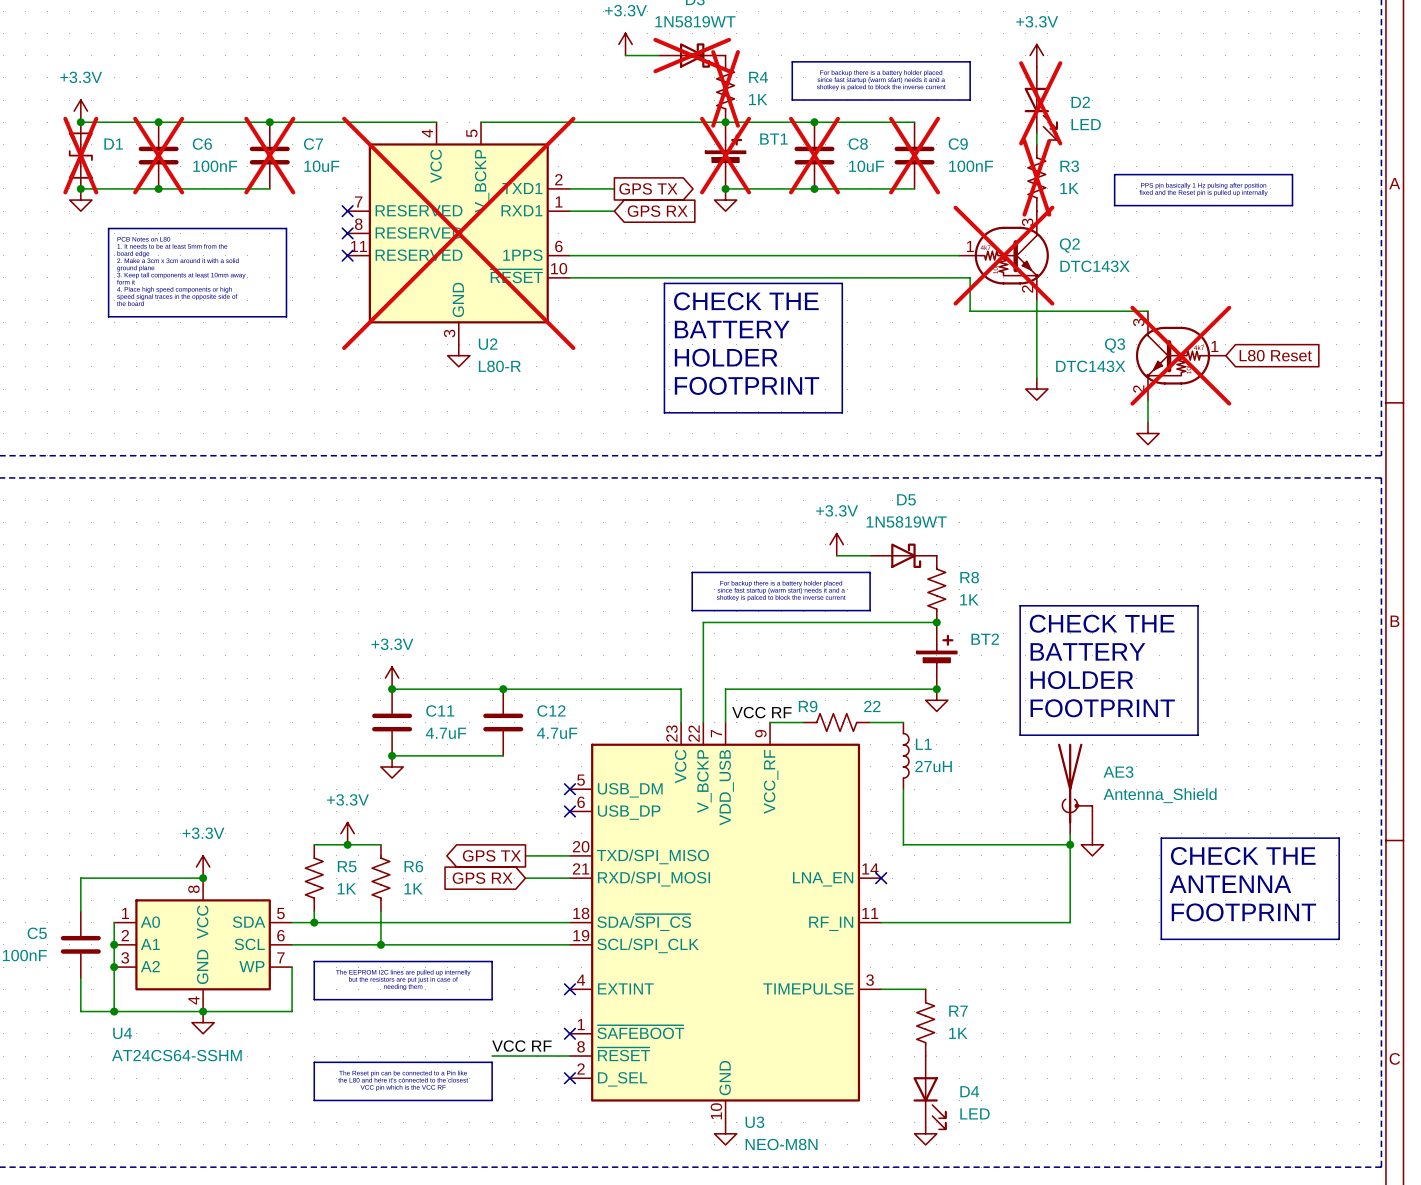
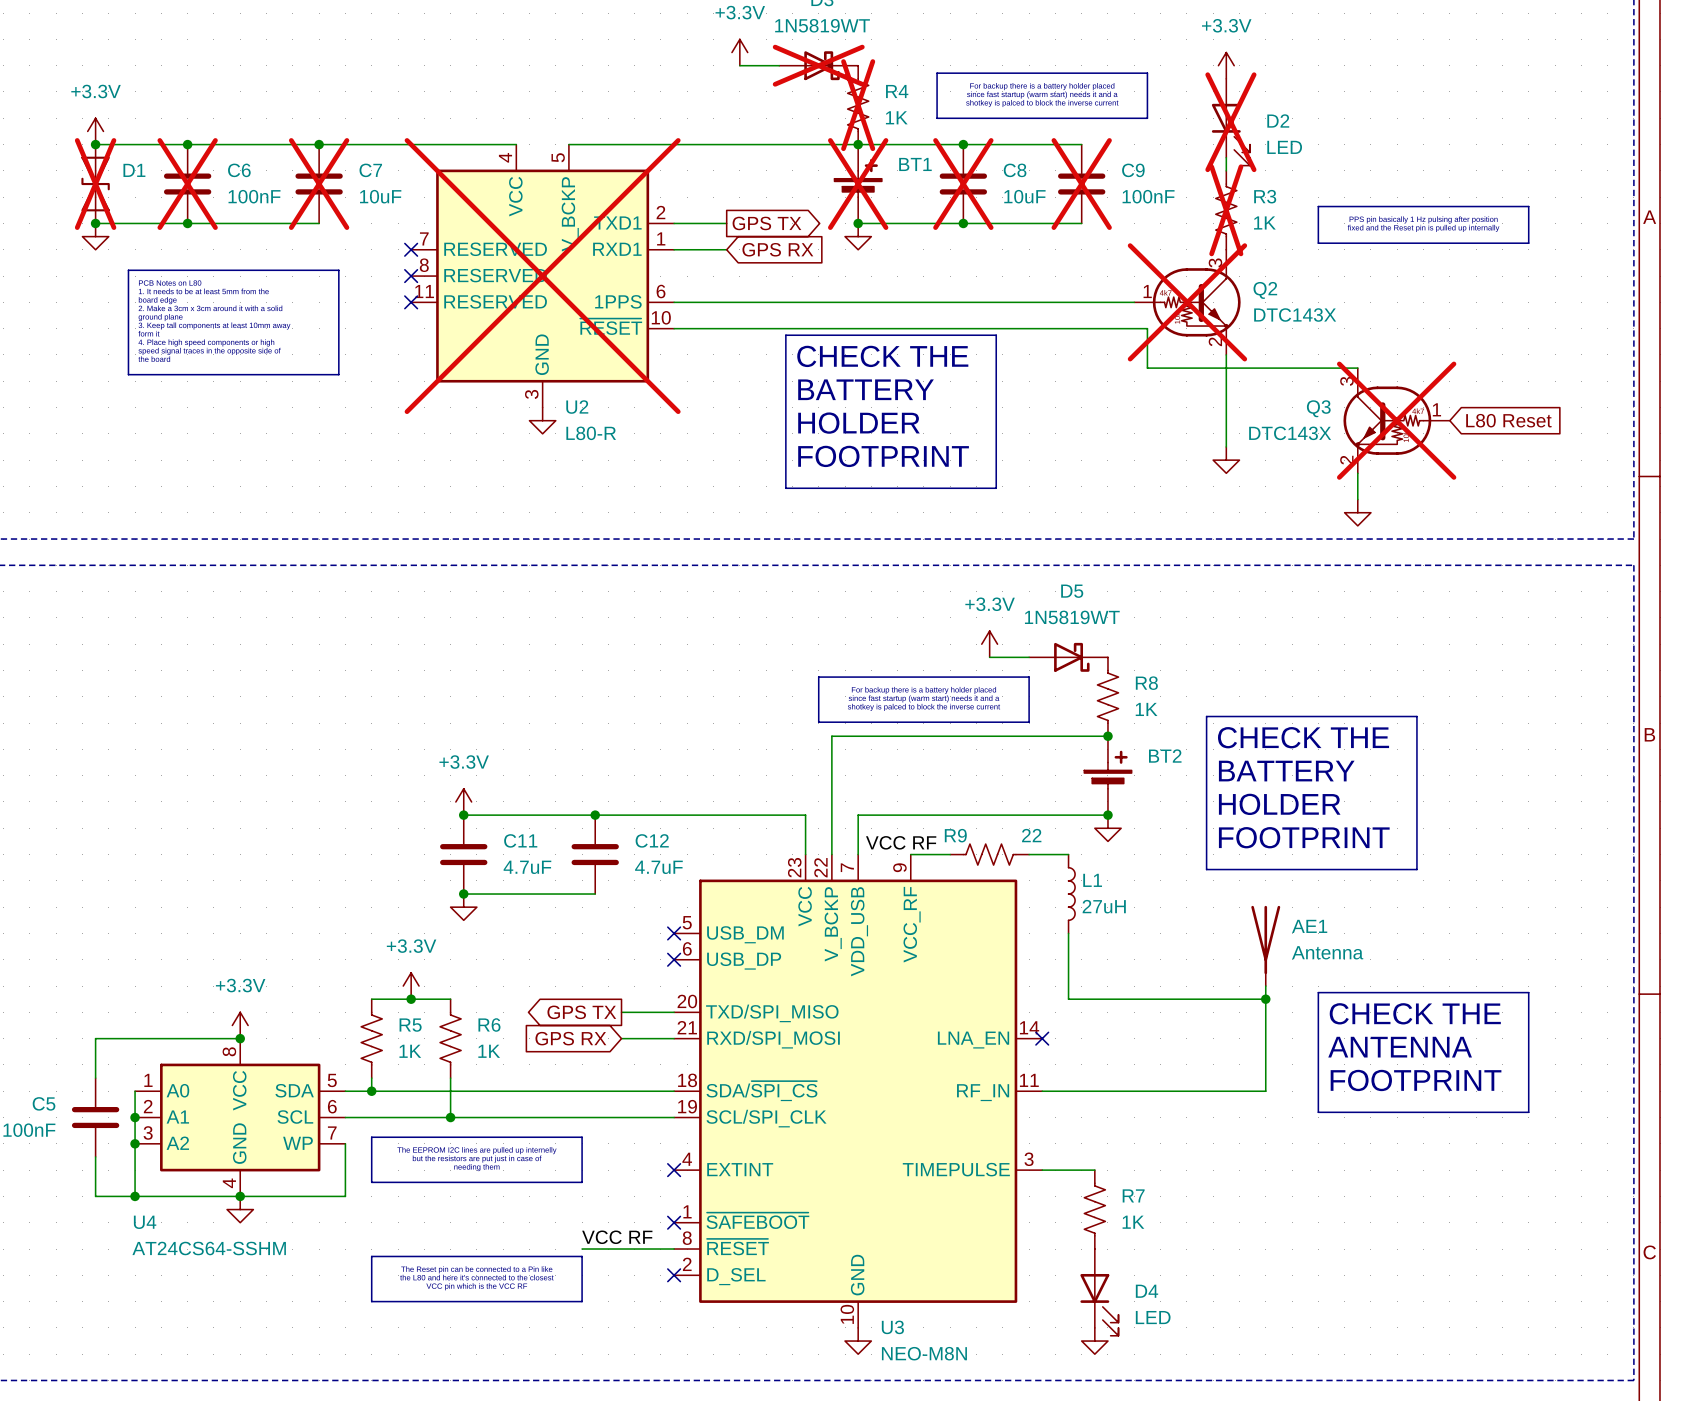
AE3: Antenna_Shield (1075, 788) -> none
AE1: none -> Antenna (1265, 945)
line: (1161, 838) (1339, 838) (1339, 939) (1161, 939) (1161, 838) -> (1318, 992) (1528, 992) (1528, 1112) (1318, 1112) (1318, 992)
power symbol: (1092, 844) -> none
text position: CHECK THE (1243, 856) -> CHECK THE (1415, 1013)
text position: ANTENNA (1230, 884) -> ANTENNA (1400, 1047)
text position: FOOTPRINT (1243, 912) -> FOOTPRINT (1416, 1080)

